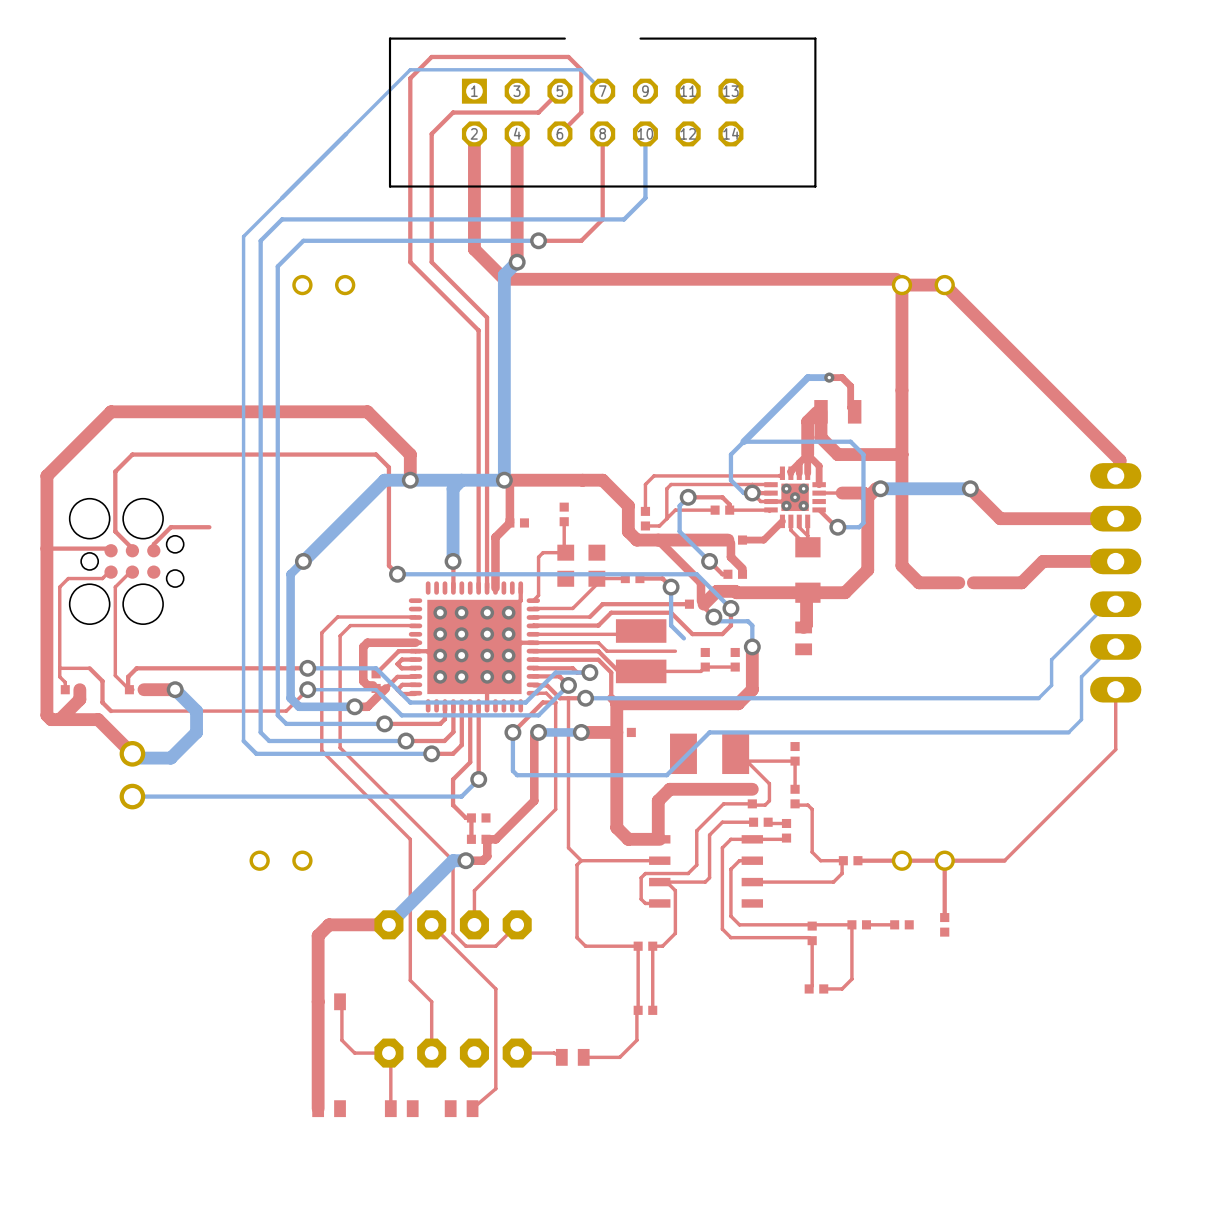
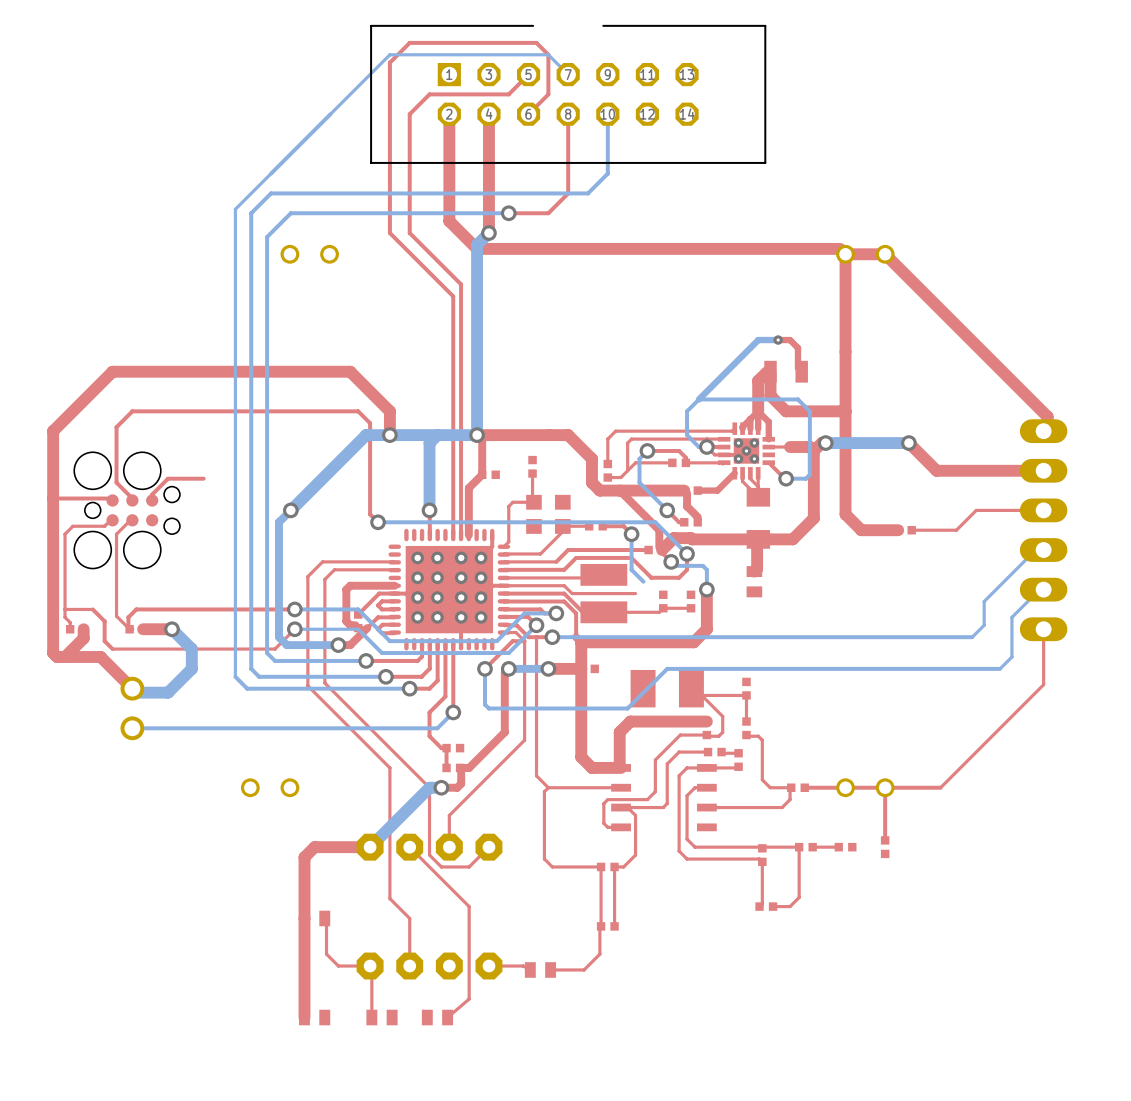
top track width: thick (1115, 561) (1043, 561) (1021, 582) (973, 582) -> thin (1043, 510) (976, 510) (956, 530) (911, 530)

